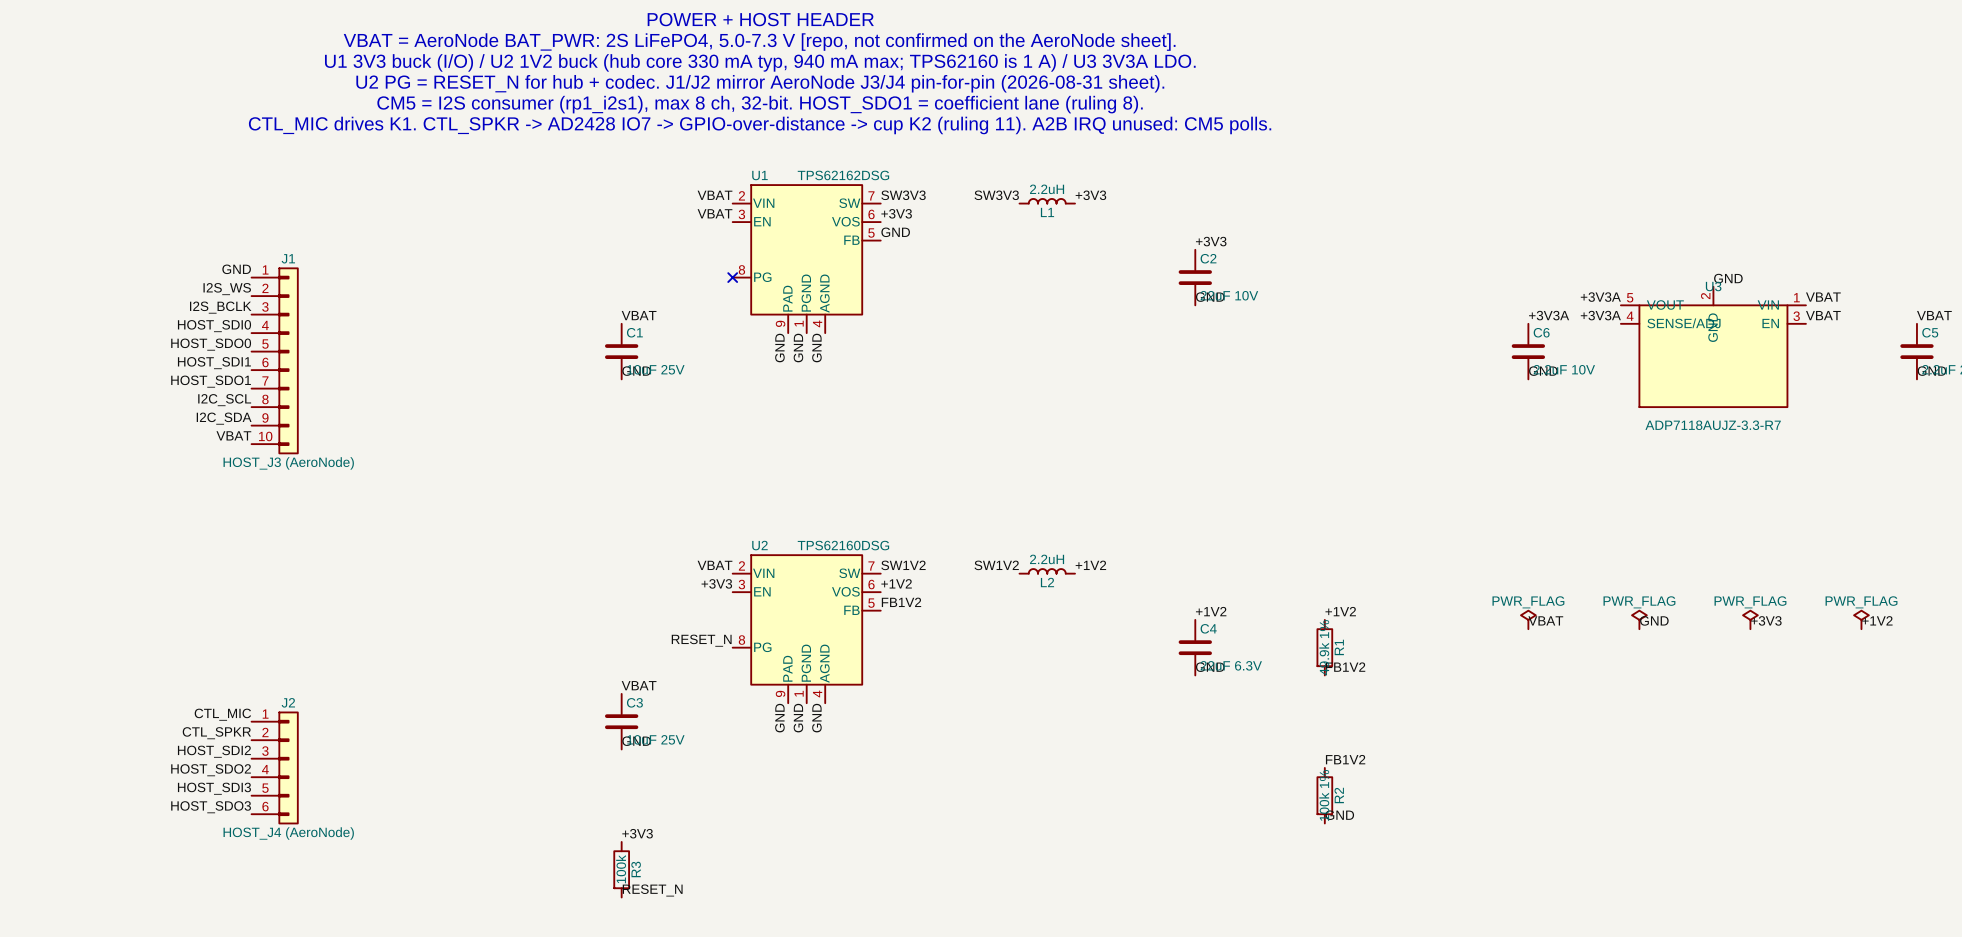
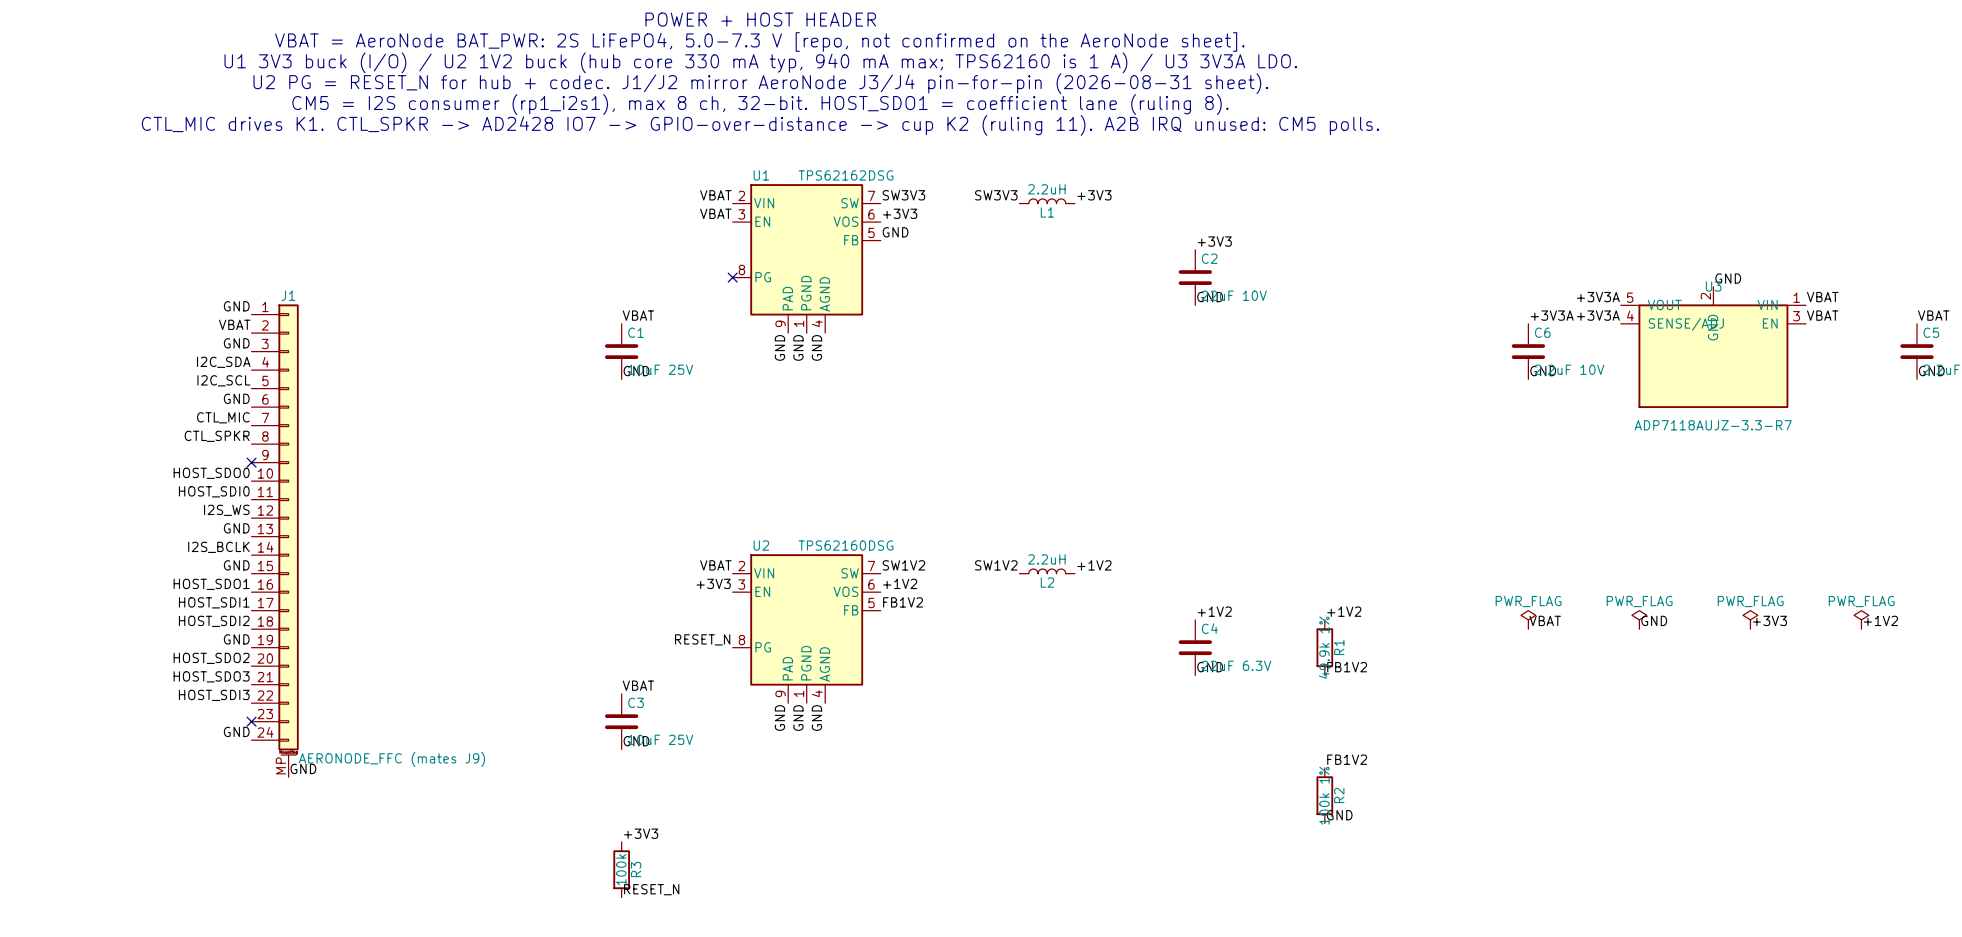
J1 name position: J1 (288, 258) -> J1 (288, 295)
J1 symbol: [251, 267, 299, 455] -> [251, 304, 299, 778]
label: GND (236, 269) -> none
label: I2S_WS (227, 289) -> none
label: I2S_BCLK (220, 307) -> GND (236, 306)
label: HOST_SDI0 (214, 326) -> VBAT (234, 324)
label: HOST_SDO0 (211, 344) -> GND (236, 343)
label: HOST_SDI1 (214, 363) -> I2C_SDA (223, 362)
label: HOST_SDO1 (211, 381) -> I2C_SCL (223, 380)
label: I2C_SCL (224, 400) -> GND (236, 398)
label: I2C_SDA (224, 418) -> CTL_MIC (223, 417)
label: VBAT (233, 435) -> CTL_SPKR (217, 436)
no-connect mark: none -> (251, 462)
J1 value: HOST_J3 (AeroNode) (288, 463) -> AERONODE_FFC (mates J9) (391, 759)
label: none -> HOST_SDO0 (211, 473)
label: none -> HOST_SDI0 (214, 491)
label: none -> I2S_WS (226, 510)
label: none -> GND (236, 528)
label: none -> I2S_BCLK (218, 547)
label: none -> GND (236, 565)
label: none -> HOST_SDO1 (211, 584)
label: none -> HOST_SDI1 (214, 602)
label: none -> GND (236, 639)
label: CTL_MIC (222, 714) -> none
no-connect mark: none -> (251, 721)
label: CTL_SPKR (216, 733) -> GND (236, 731)
label position: HOST_SDI2 (214, 751) -> HOST_SDI2 (214, 621)
J2: HOST_J4 (AeroNode) (275, 767) -> none
label: none -> GND (303, 768)
label position: HOST_SDO2 (211, 770) -> HOST_SDO2 (211, 658)
label position: HOST_SDI3 (214, 788) -> HOST_SDI3 (214, 695)
label position: HOST_SDO3 (211, 807) -> HOST_SDO3 (211, 676)

